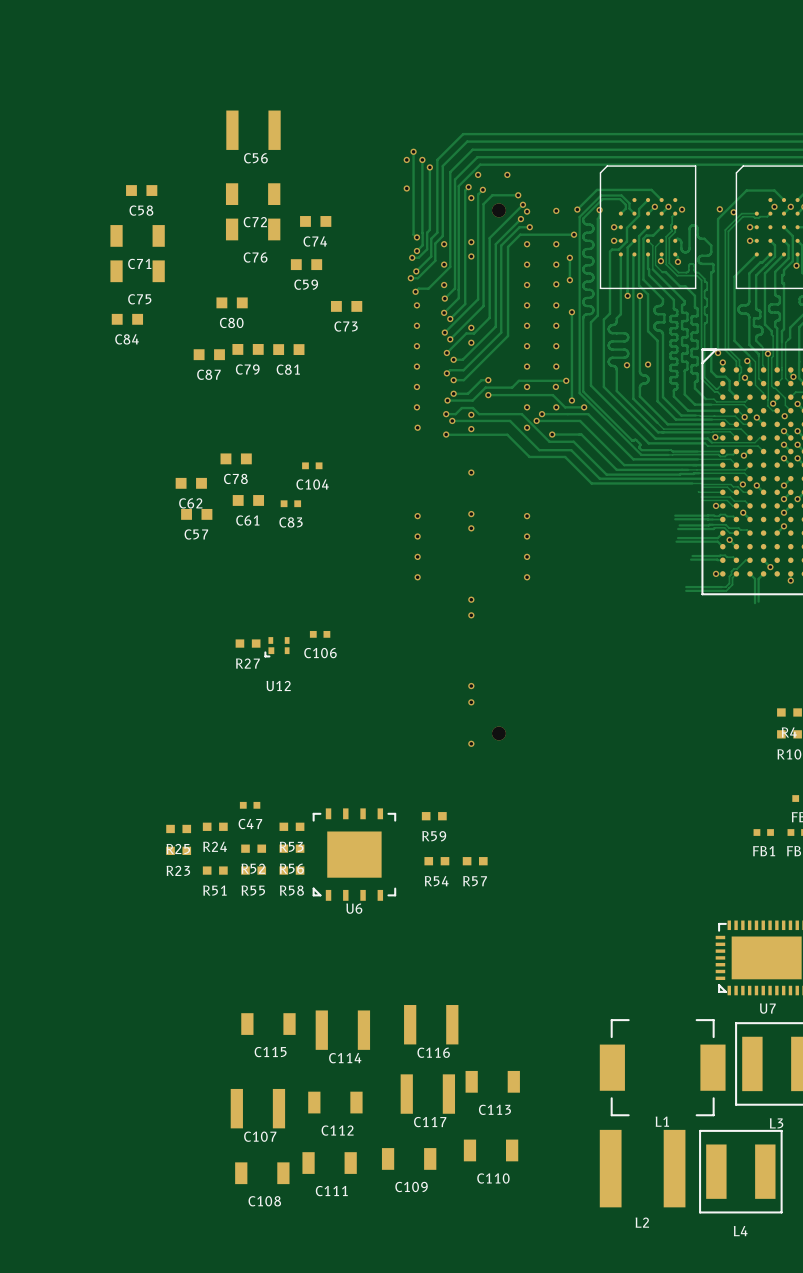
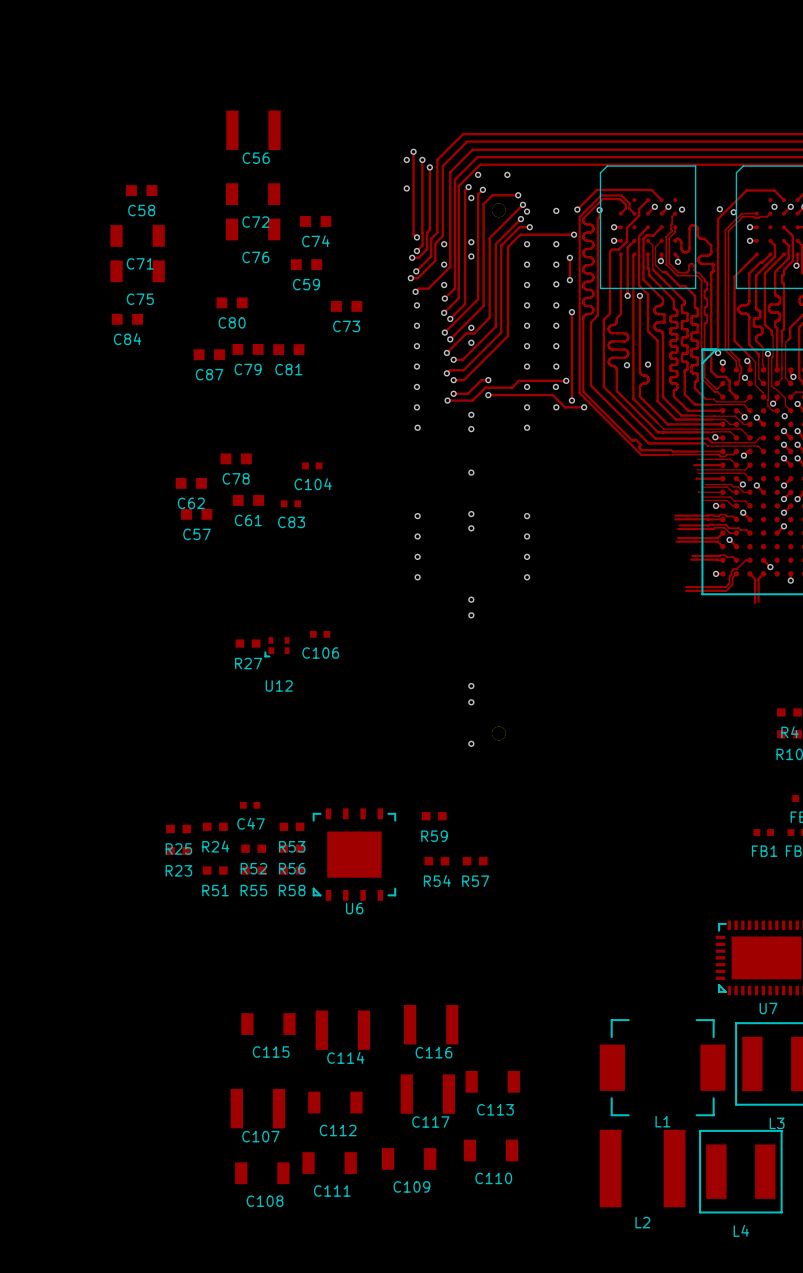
track: (446, 414) (455, 414) (461, 408) (472, 408) (479, 414) (521, 414) (549, 441) (573, 441) (606, 474) (699, 473) -> none
via: (446, 414) -> none
track: (542, 414) (588, 414) (633, 459) (698, 459) -> none
via: (542, 414) -> none
track: (452, 420) (510, 420) (539, 450) (571, 450) (599, 478) (696, 478) -> none
via: (452, 420) -> none
track: (536, 420) (580, 420) (624, 465) (694, 465) -> none
via: (536, 420) -> none
track: (446, 434) (507, 434) (529, 456) (565, 456) (591, 483) (705, 484) -> none
via: (446, 434) -> none
track: (552, 434) (581, 434) (616, 469) (696, 469) -> none
via: (552, 434) -> none

